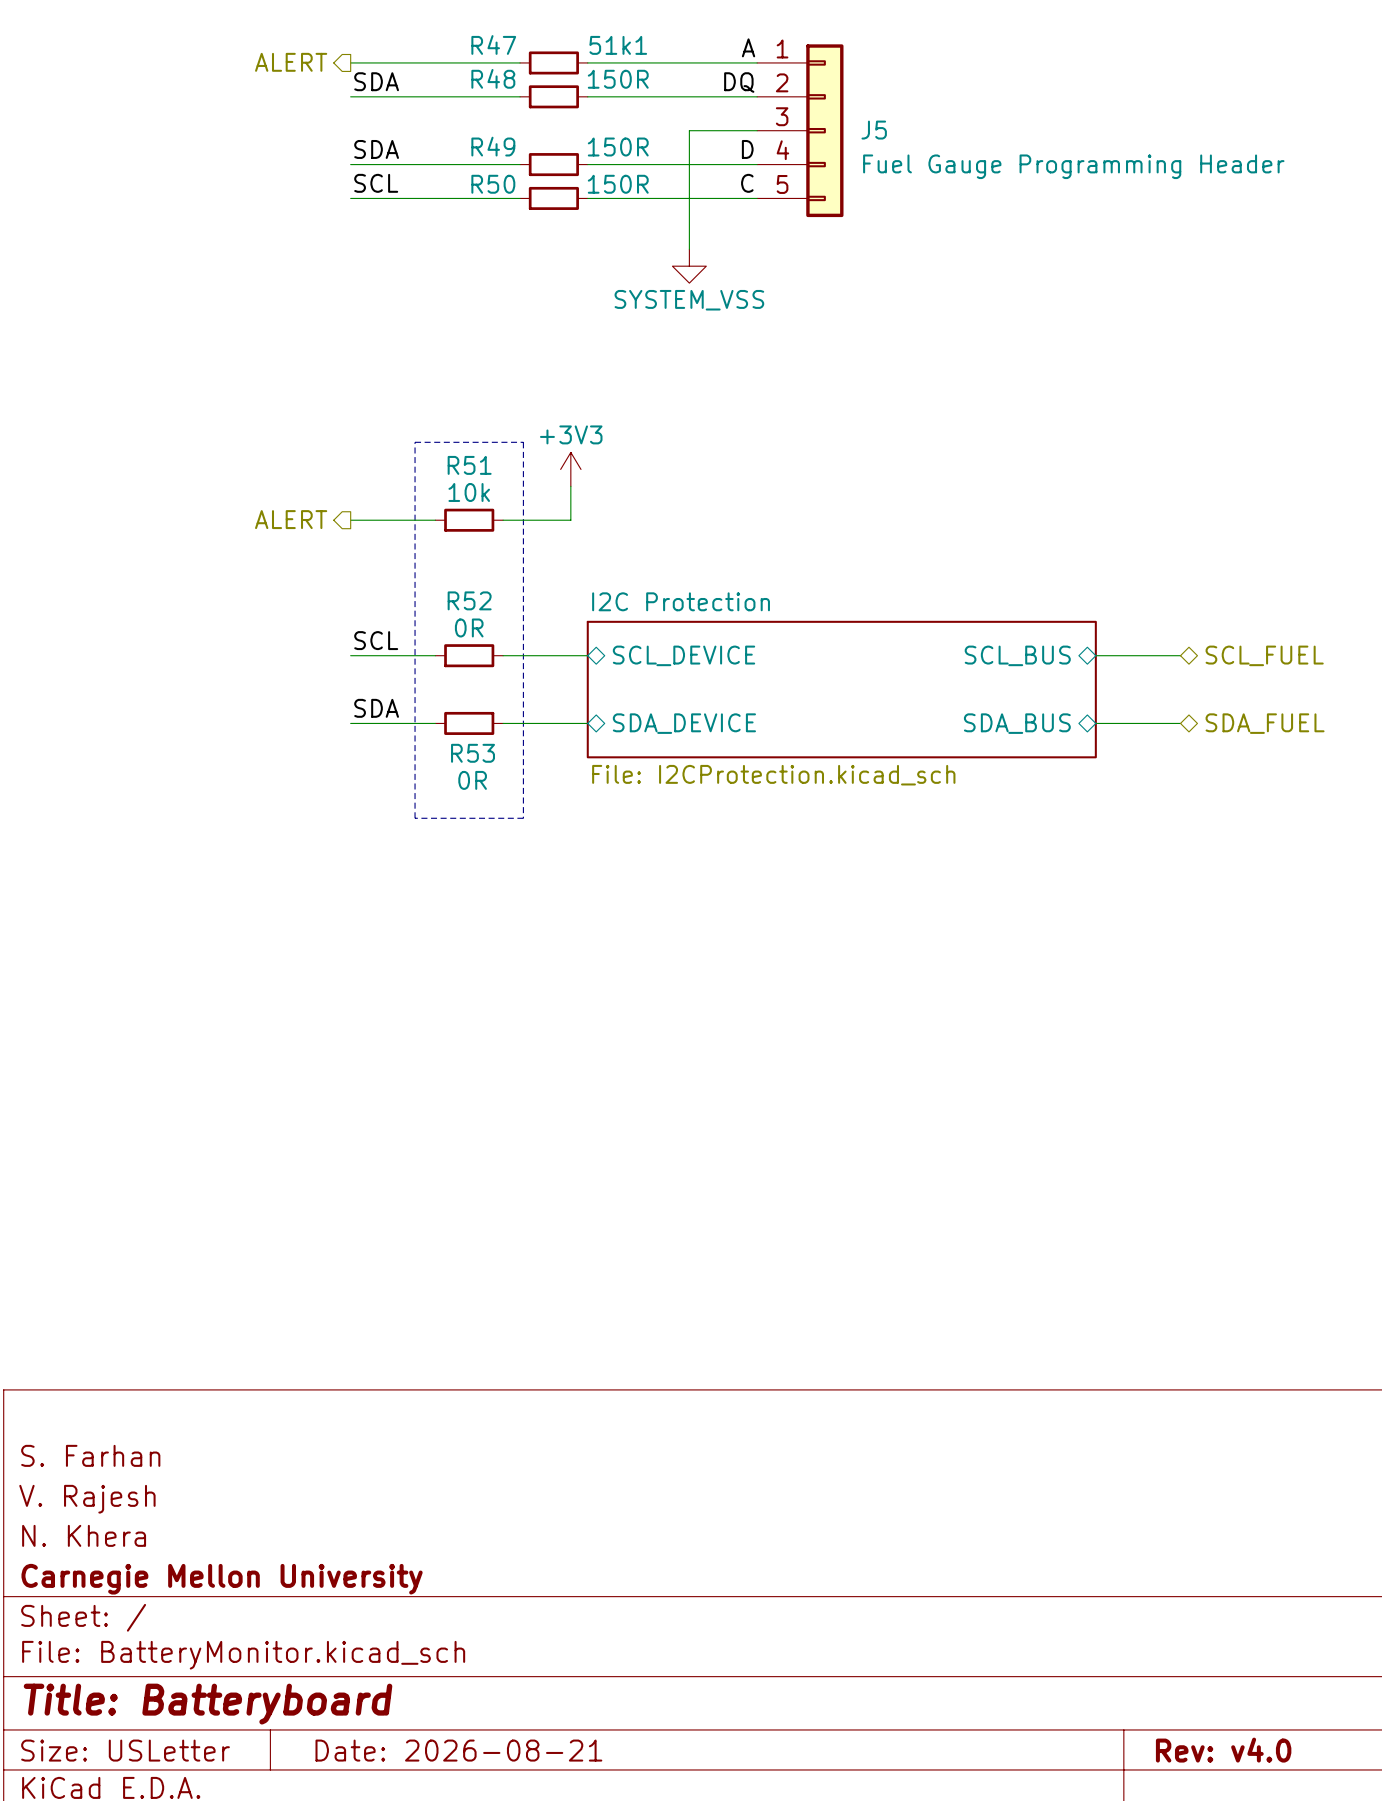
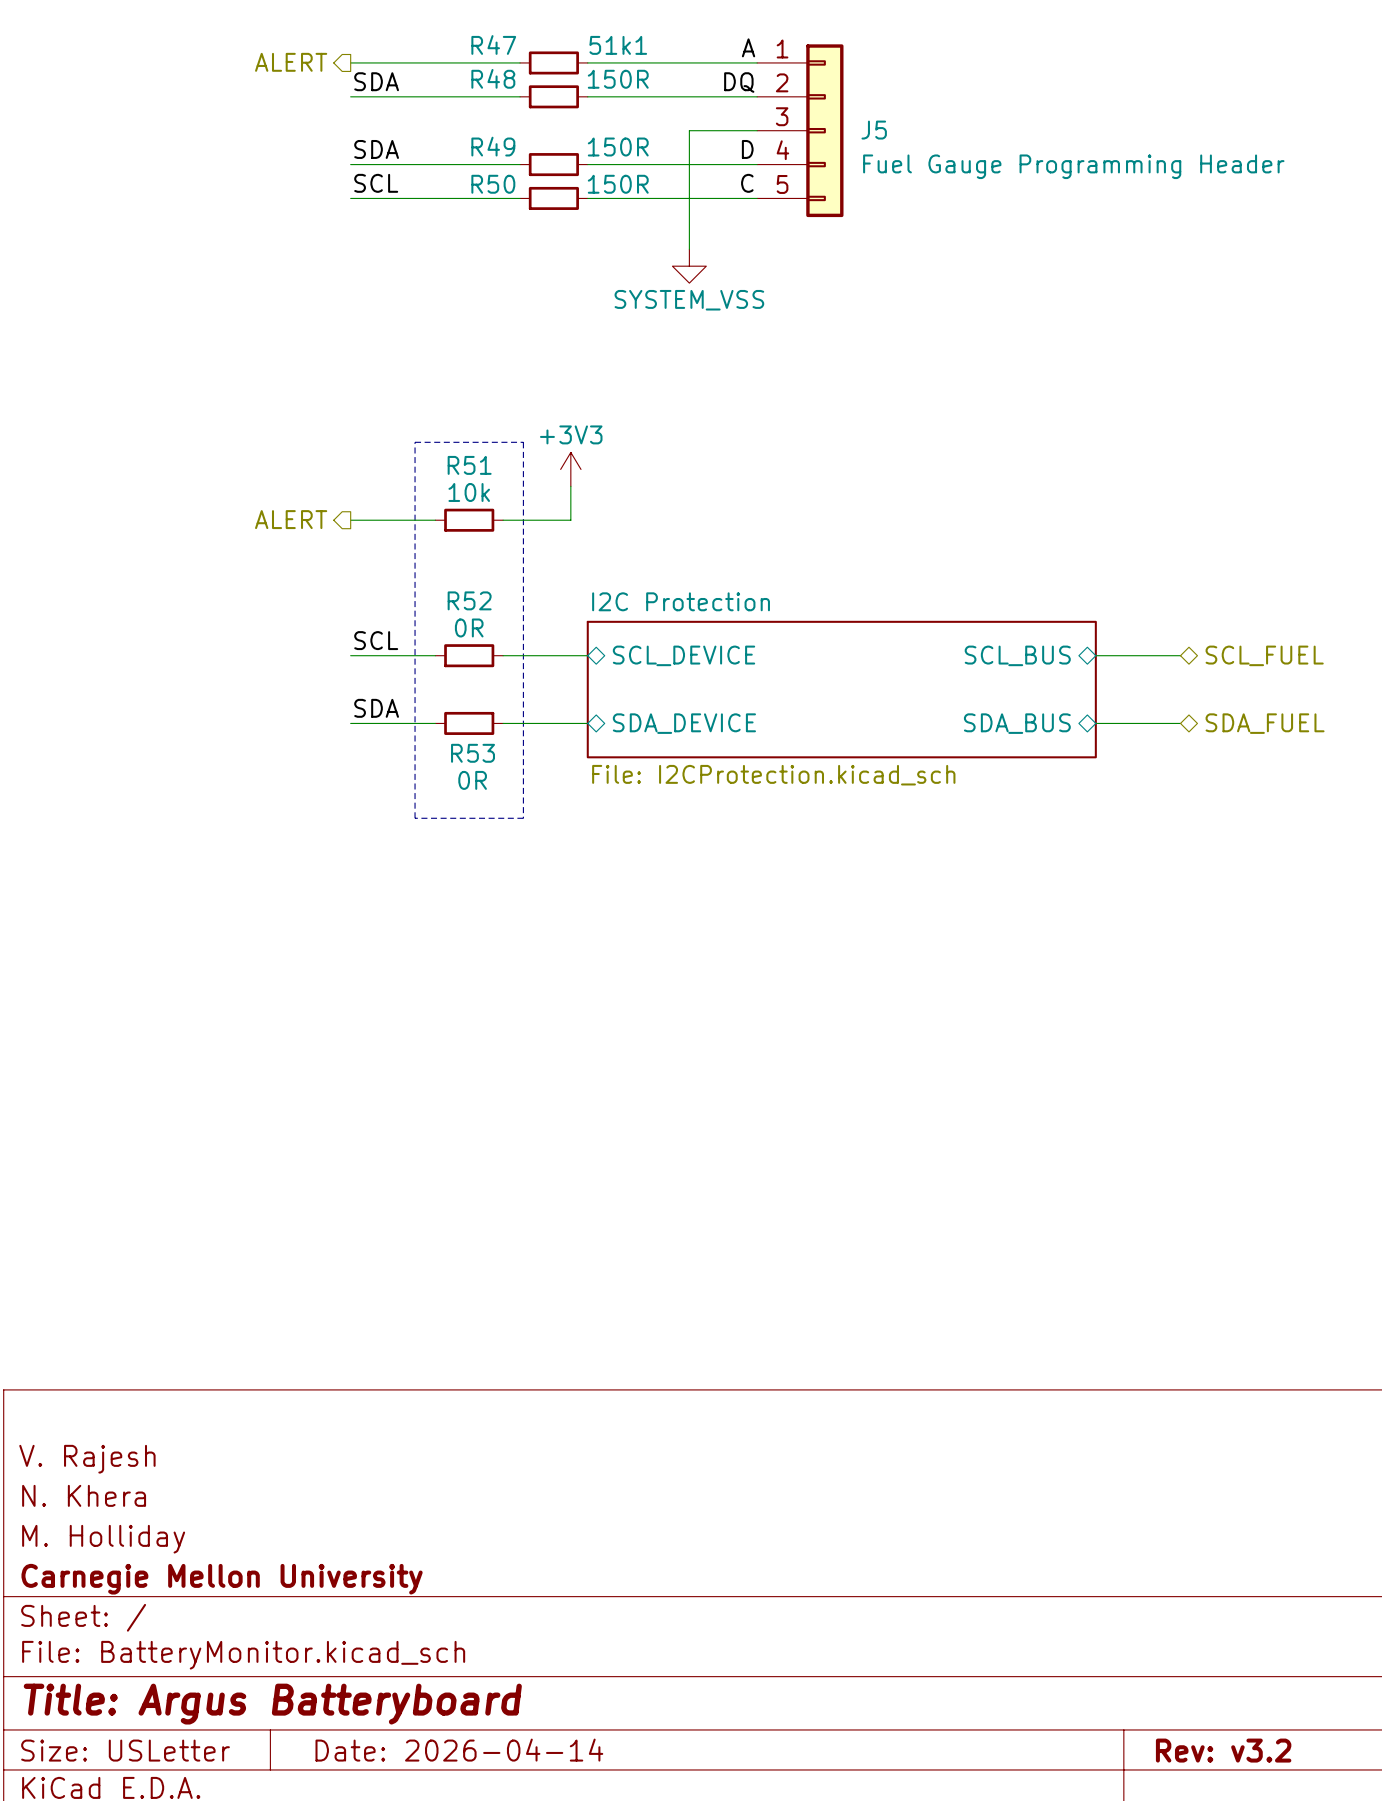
title block: S. Farhan (90, 1455) -> V. Rajesh (87, 1459)
title block: V. Rajesh (87, 1499) -> N. Khera (84, 1495)
title block: N. Khera (84, 1535) -> M. Holliday (103, 1539)
title block: Title: Batteryboard (208, 1704) -> Title: Argus Batteryboard (272, 1704)
title block: Date: 2026-08-21 (458, 1750) -> Date: 2026-04-14 (459, 1750)
title block: Rev: v4.0 (1223, 1750) -> Rev: v3.2 (1223, 1750)

